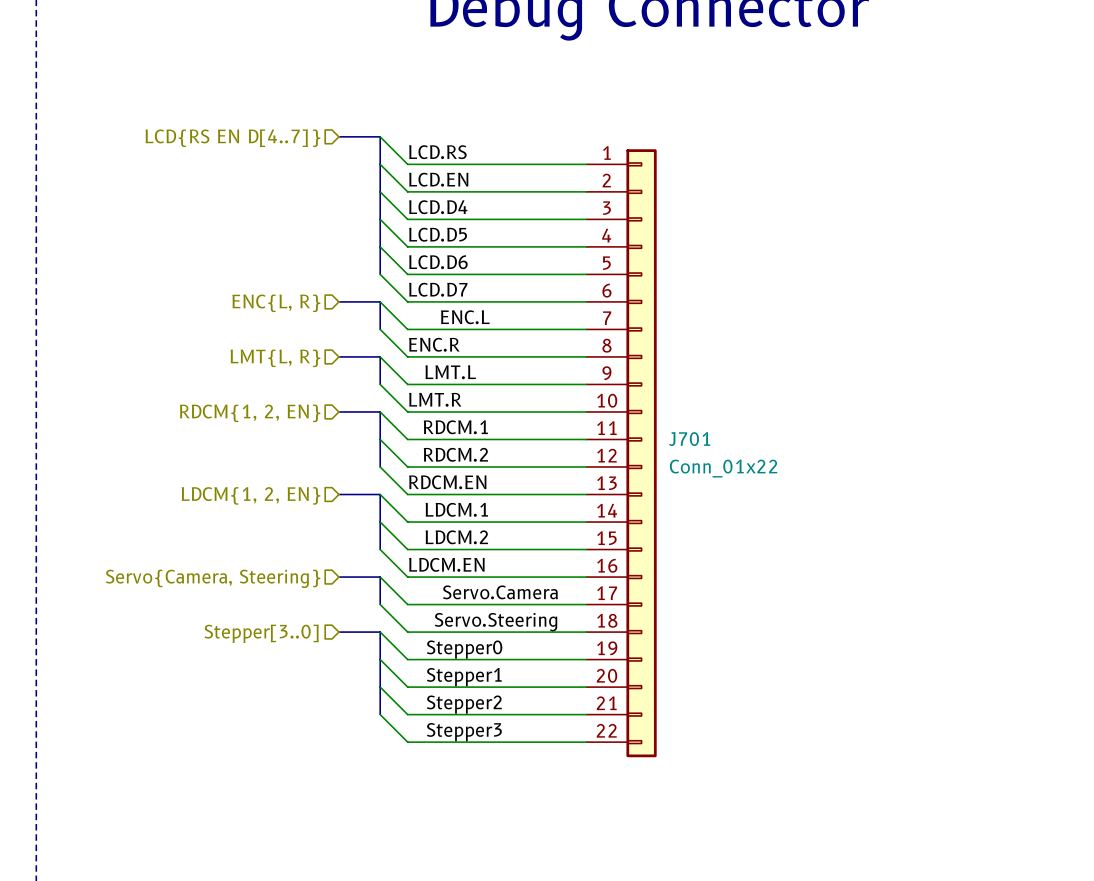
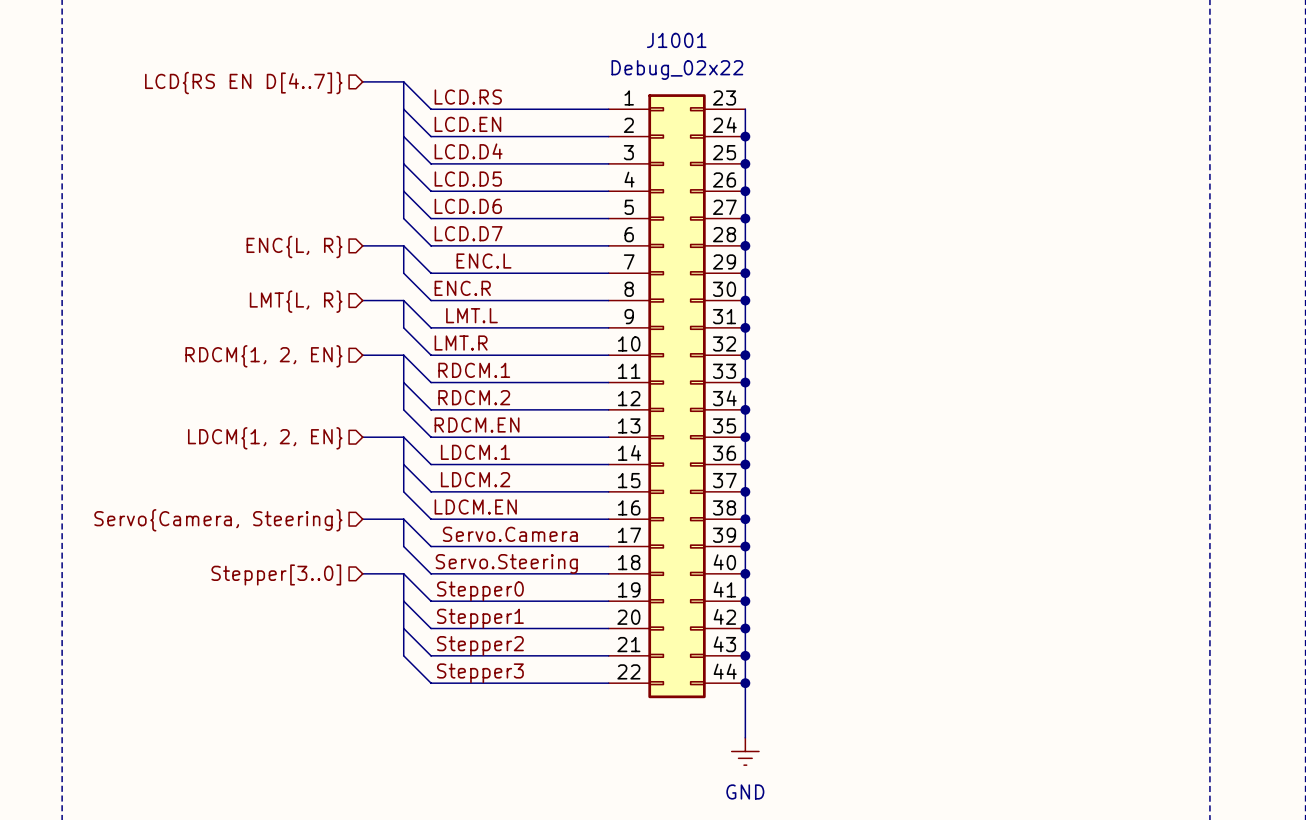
wire: none -> (745, 109) (745, 737)
junction: none -> (745, 136)
junction: none -> (745, 163)
junction: none -> (745, 191)
junction: none -> (745, 218)
junction: none -> (745, 245)
junction: none -> (745, 273)
junction: none -> (745, 300)
junction: none -> (745, 327)
junction: none -> (745, 355)
junction: none -> (745, 382)
J701: Conn_01x22 (621, 453) -> none
J1001: none -> Debug_02x22 (677, 396)
junction: none -> (745, 409)
junction: none -> (745, 437)
junction: none -> (745, 464)
junction: none -> (745, 491)
junction: none -> (745, 519)
junction: none -> (745, 546)
junction: none -> (745, 573)
junction: none -> (745, 601)
junction: none -> (745, 628)
junction: none -> (745, 655)
junction: none -> (745, 683)
power symbol: none -> GND (745, 751)

